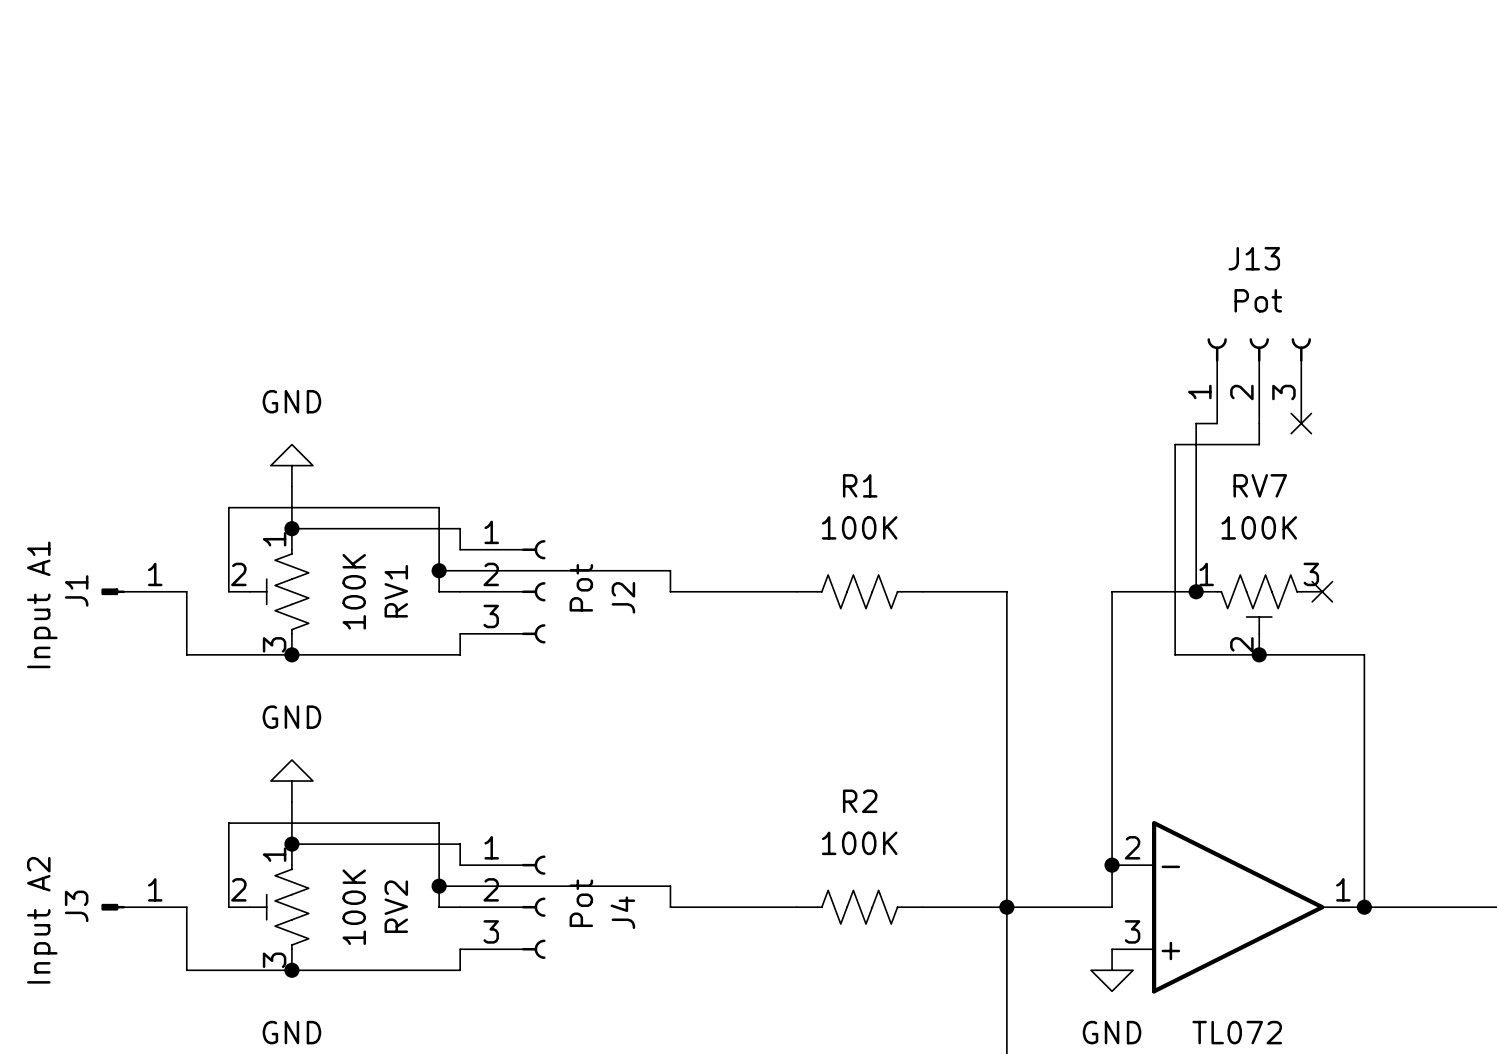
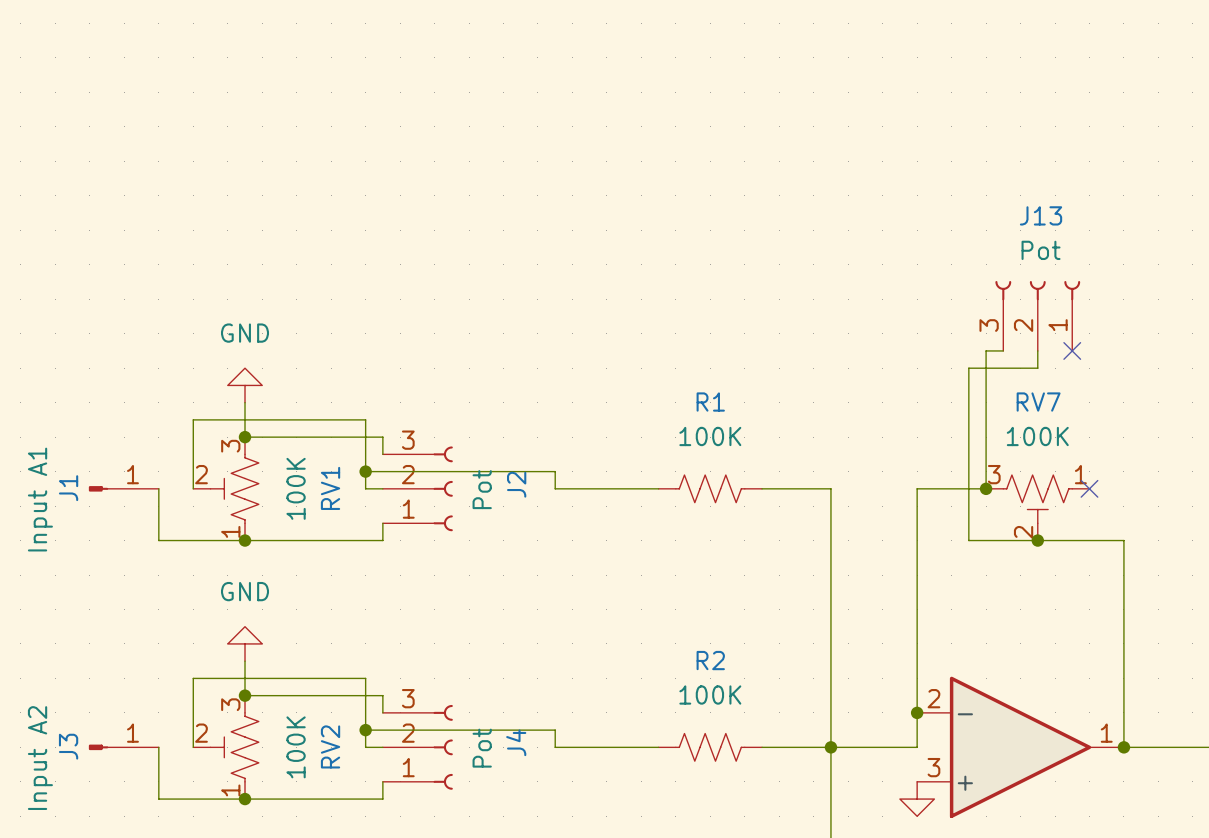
J13 flip: as is (1259, 349) -> left-right (1037, 290)
RV1 flip: as is (279, 591) -> up-down (234, 488)
J2 flip: as is (533, 591) -> up-down (443, 488)
RV7 flip: as is (1259, 604) -> left-right (1037, 499)
RV2 flip: as is (279, 907) -> up-down (234, 747)
J4 flip: as is (533, 907) -> up-down (443, 747)

